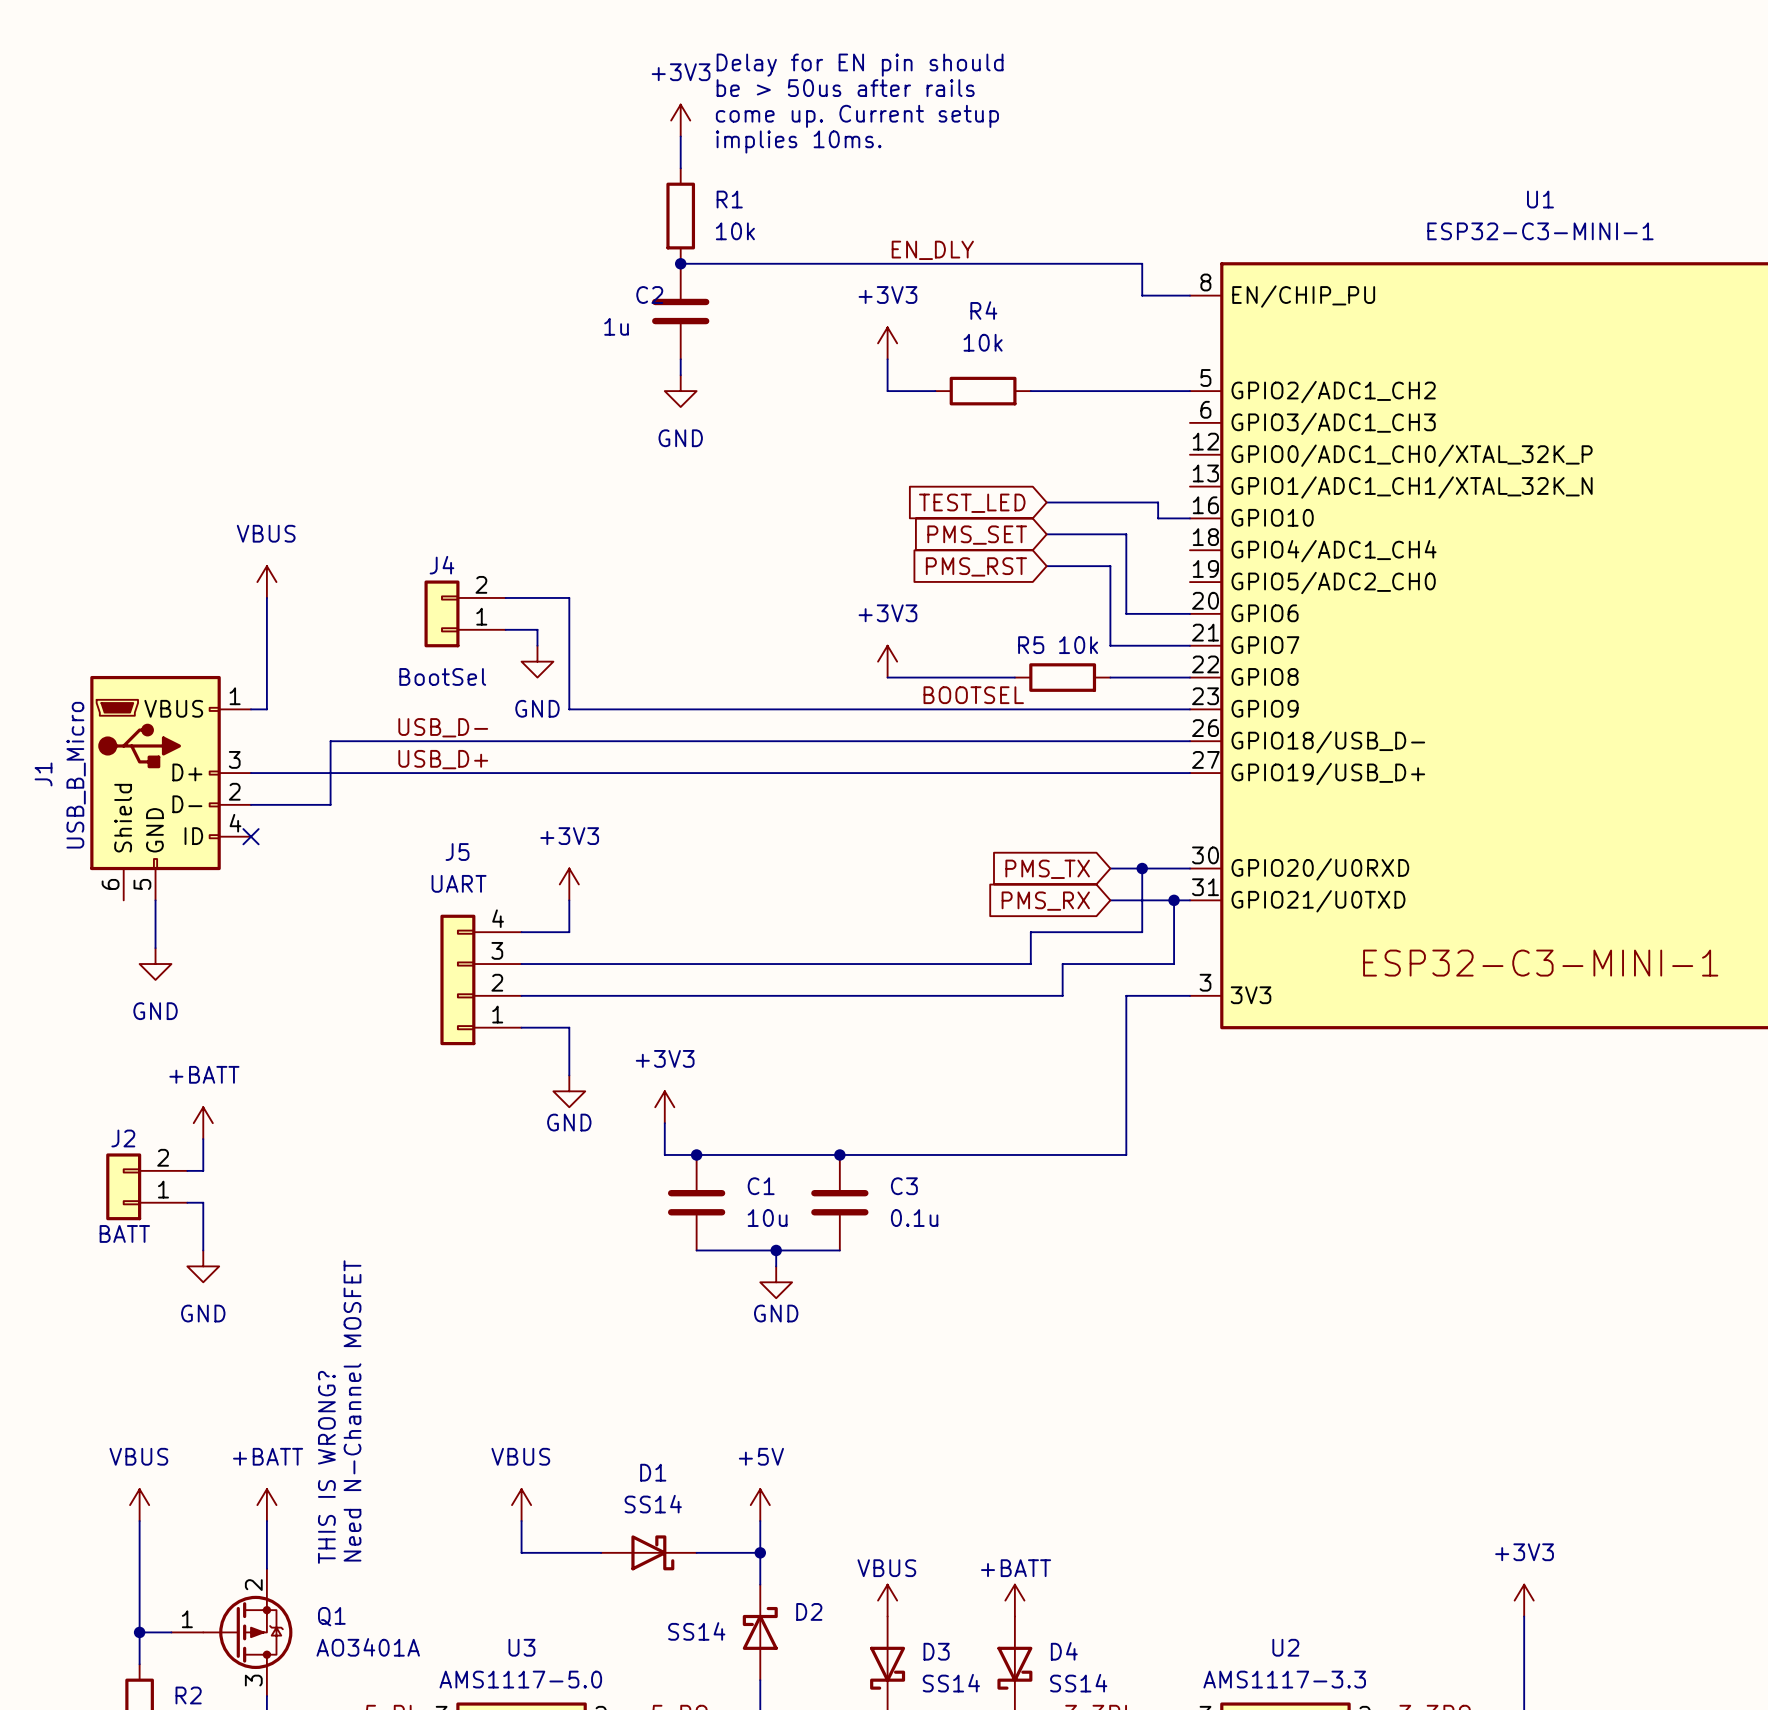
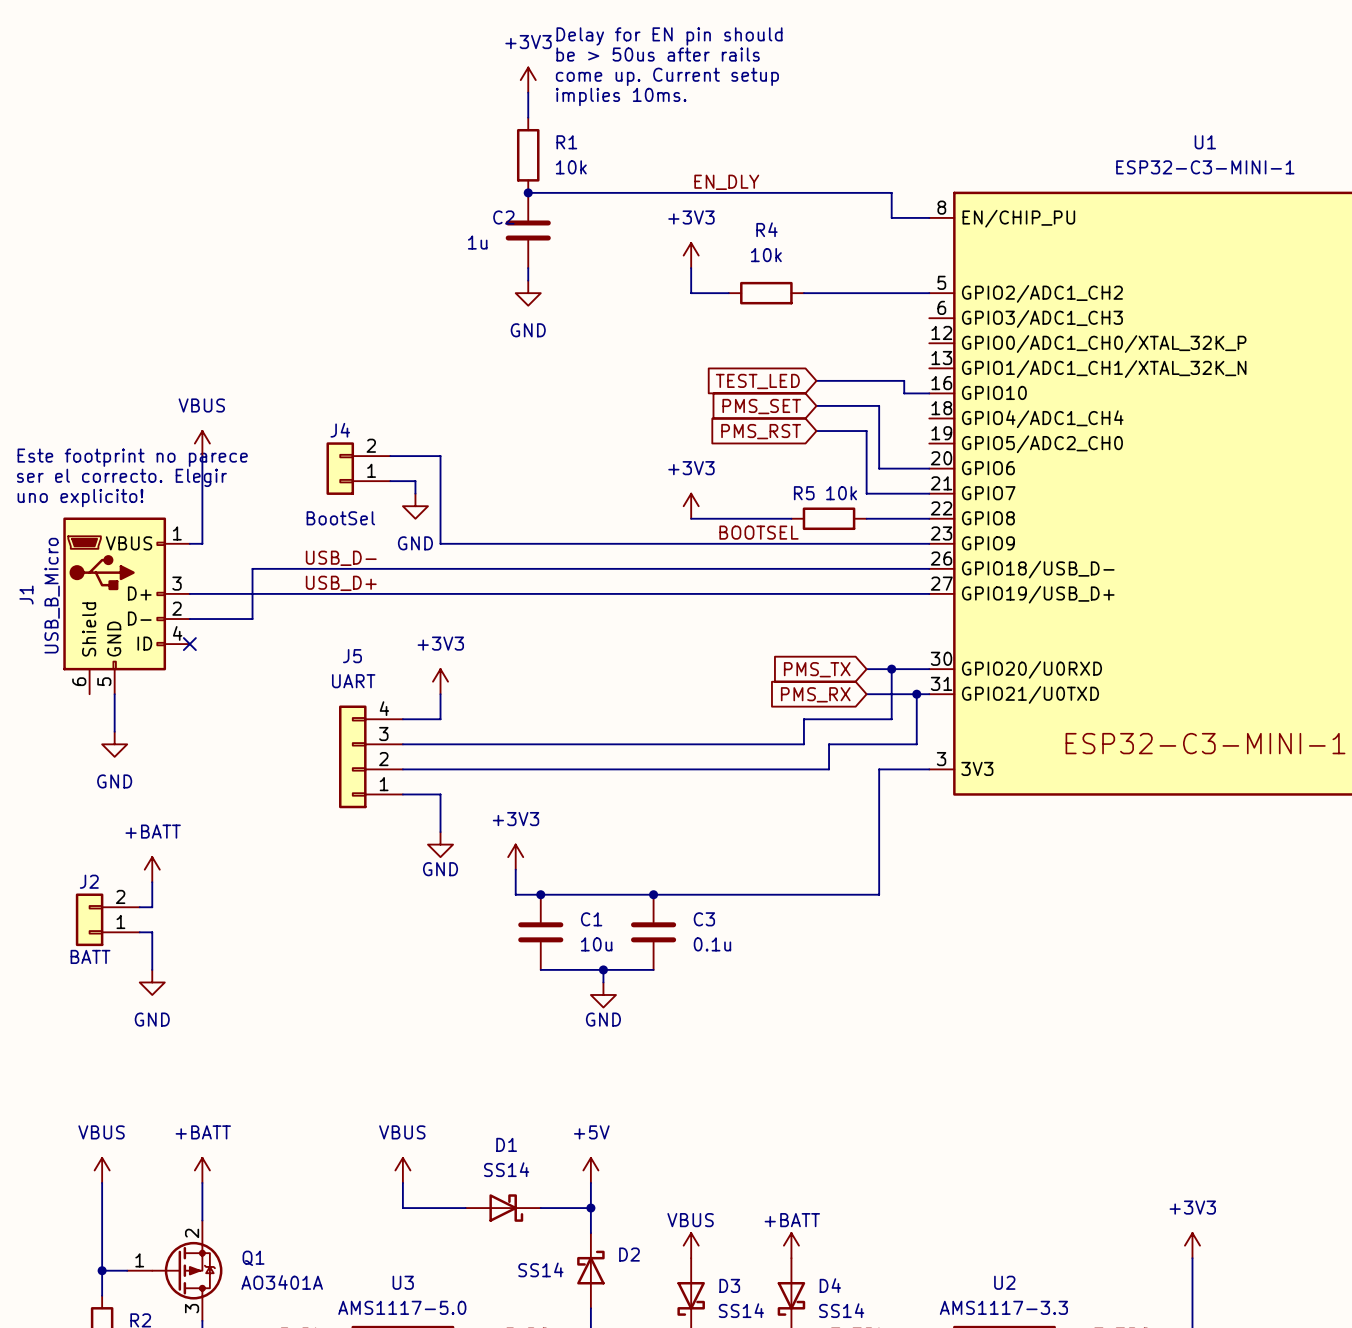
text: none -> Este footprint no parece (132, 457)
text: none -> ser el correcto. Elegir (121, 477)
text: none -> uno explicito! (80, 498)
text: Need N-Channel MOSFET (352, 1410) -> none
text: THIS IS WRONG? (326, 1467) -> none

